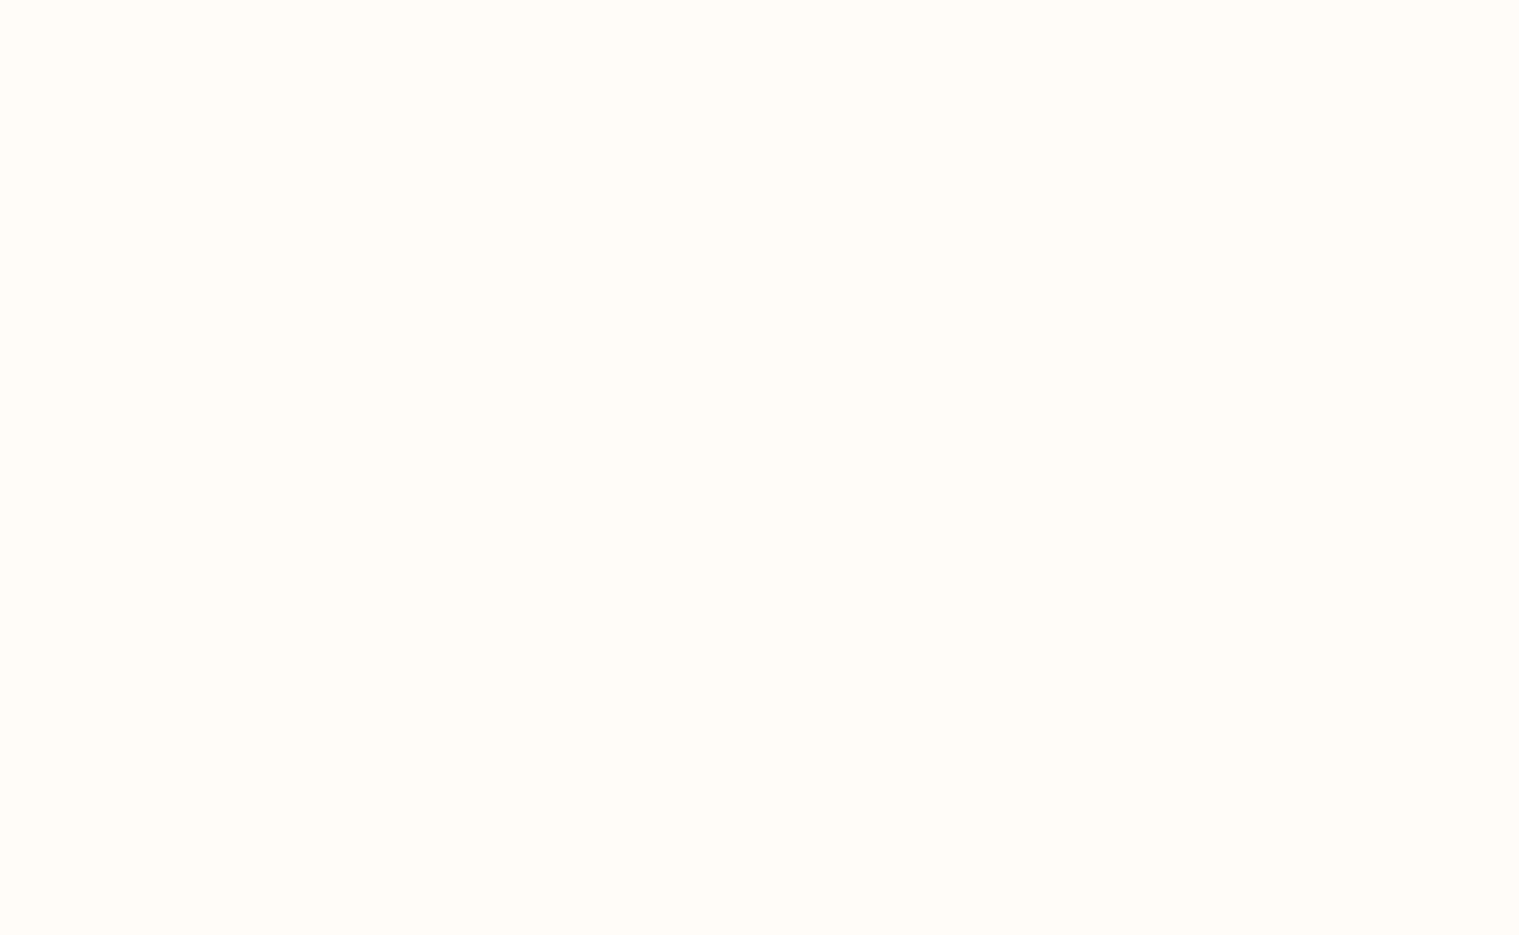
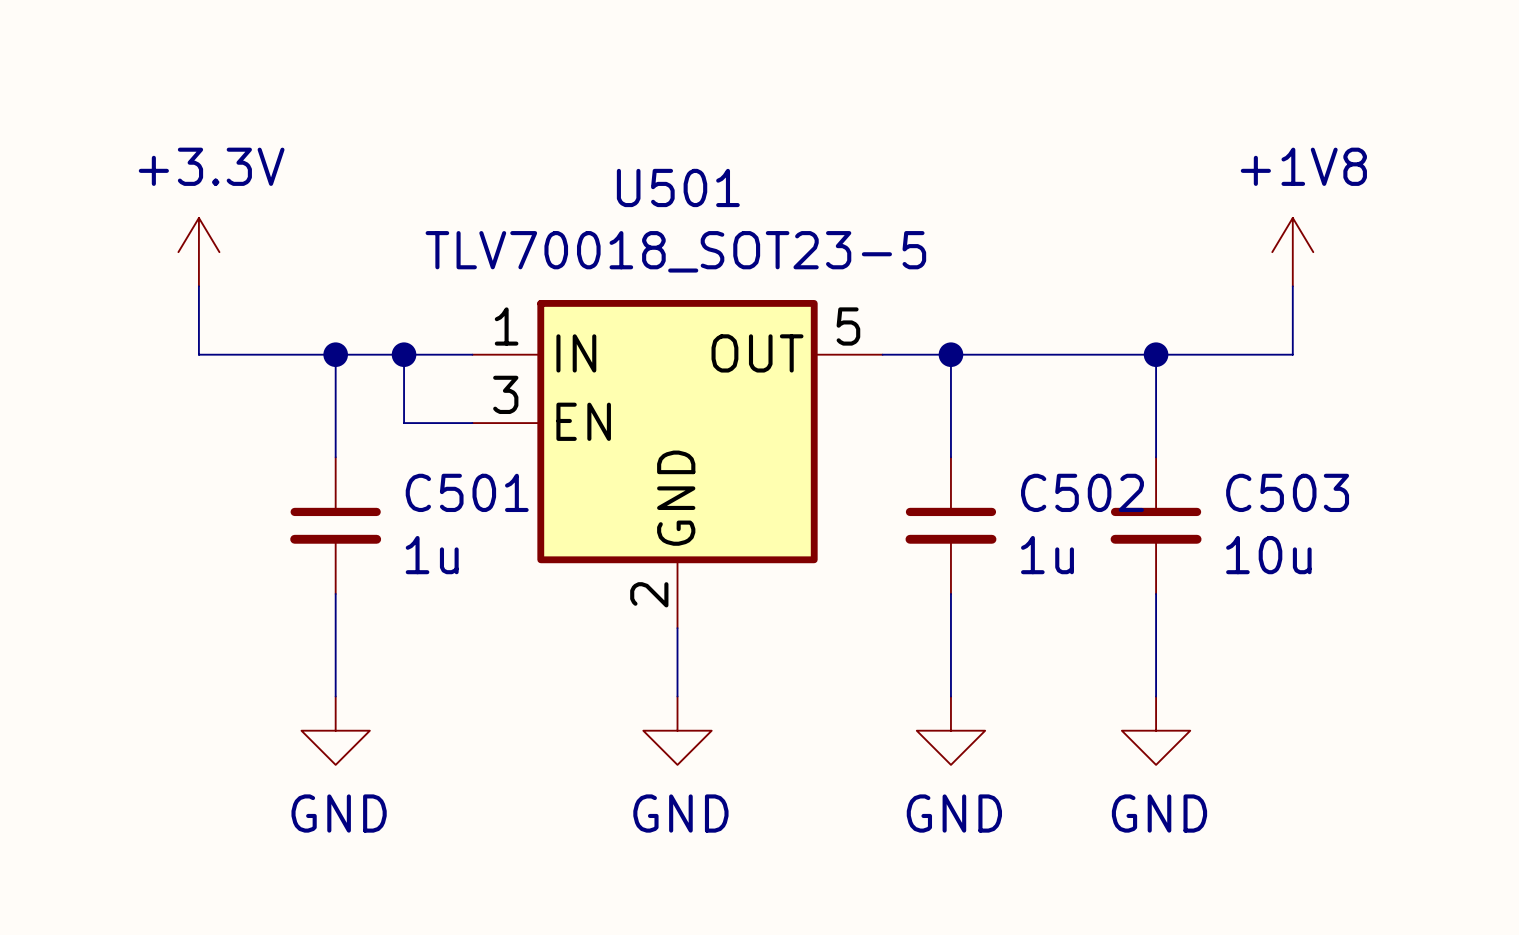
power symbol: none -> +3.3V (198, 252)
power symbol: none -> +1V8 (1292, 252)
wire: none -> (198, 286) (198, 354) (472, 354)
wire: none -> (1292, 286) (1292, 354) (882, 354)
wire: none -> (335, 354) (335, 457)
junction: none -> (335, 354)
wire: none -> (404, 354) (404, 423) (472, 423)
junction: none -> (404, 354)
wire: none -> (950, 354) (950, 457)
junction: none -> (950, 354)
wire: none -> (1156, 354) (1156, 457)
junction: none -> (1156, 354)
U501: none -> TLV70018_SOT23-5 (677, 464)
C501: none -> 1u (335, 525)
C502: none -> 1u (950, 525)
C503: none -> 10u (1156, 525)
wire: none -> (335, 593) (335, 696)
wire: none -> (950, 593) (950, 696)
wire: none -> (1156, 593) (1156, 696)
wire: none -> (677, 628) (677, 696)
power symbol: none -> GND (335, 730)
power symbol: none -> GND (677, 730)
power symbol: none -> GND (950, 730)
power symbol: none -> GND (1156, 730)

